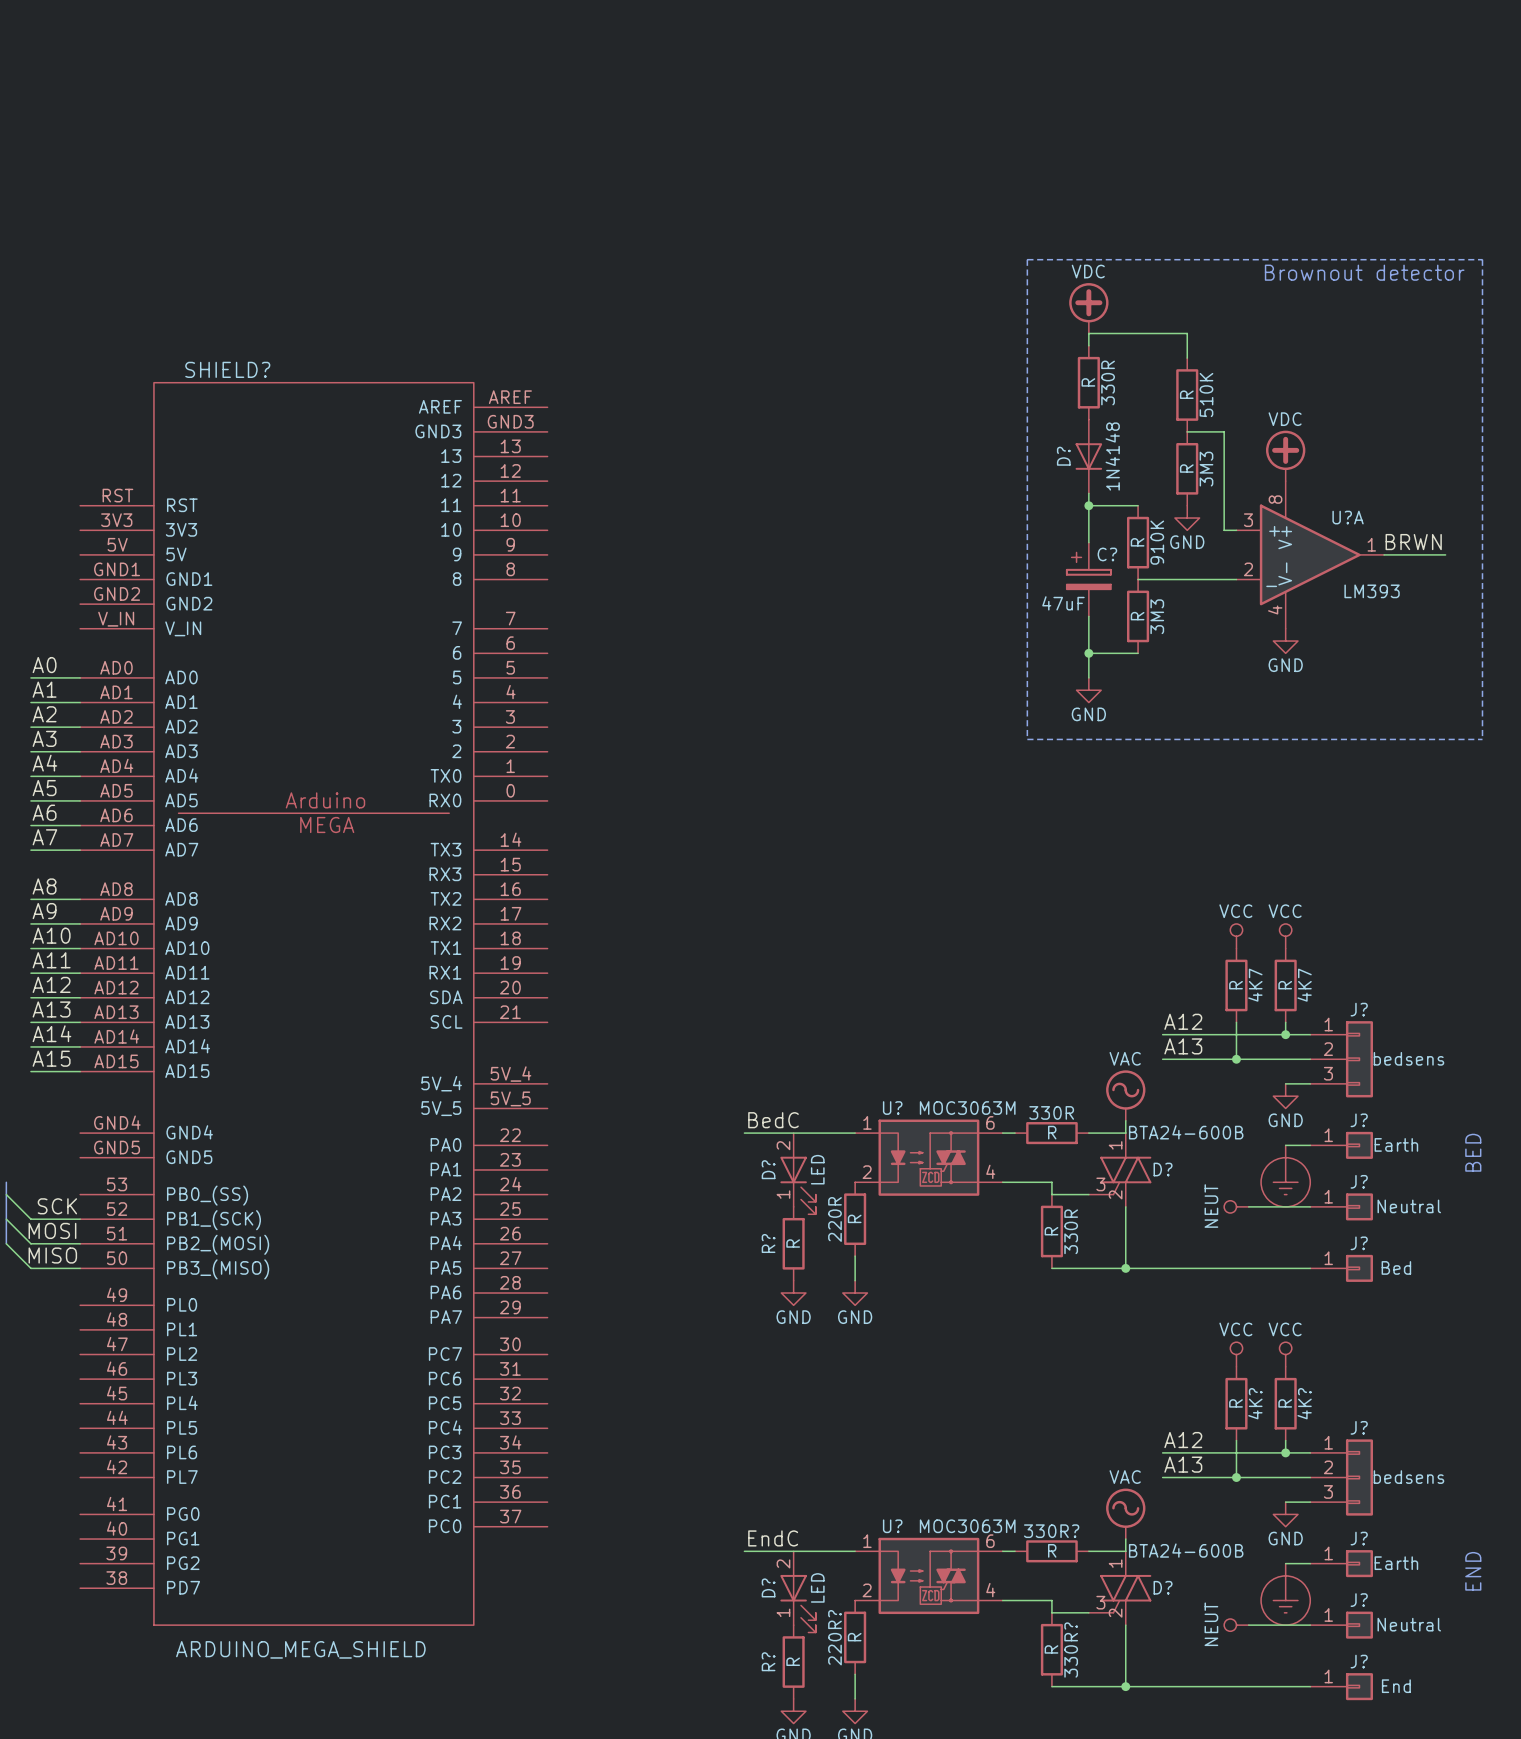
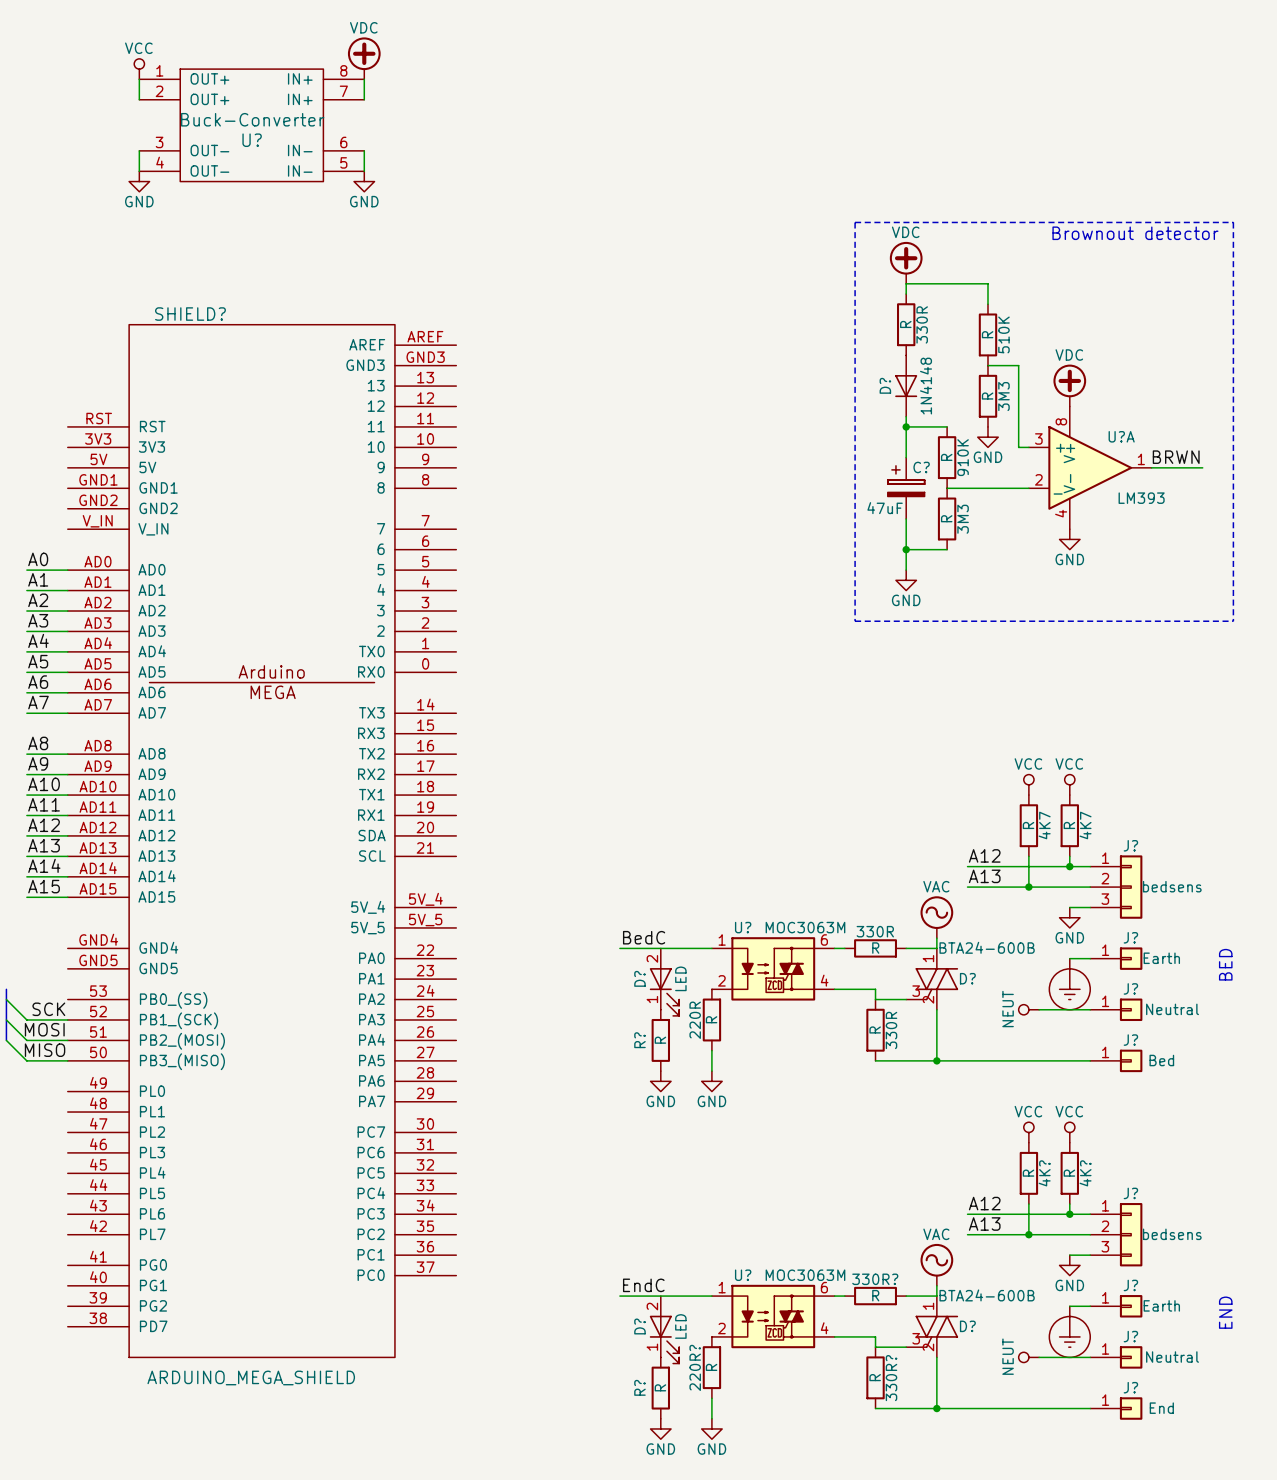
power symbol: none -> VDC (364, 58)
power symbol: none -> VCC (139, 69)
wire: none -> (139, 79) (139, 99)
wire: none -> (364, 79) (364, 99)
U?: none -> Buck-Converter (251, 125)
wire: none -> (139, 150) (139, 171)
wire: none -> (364, 150) (364, 171)
power symbol: none -> GND (139, 181)
power symbol: none -> GND (364, 181)

